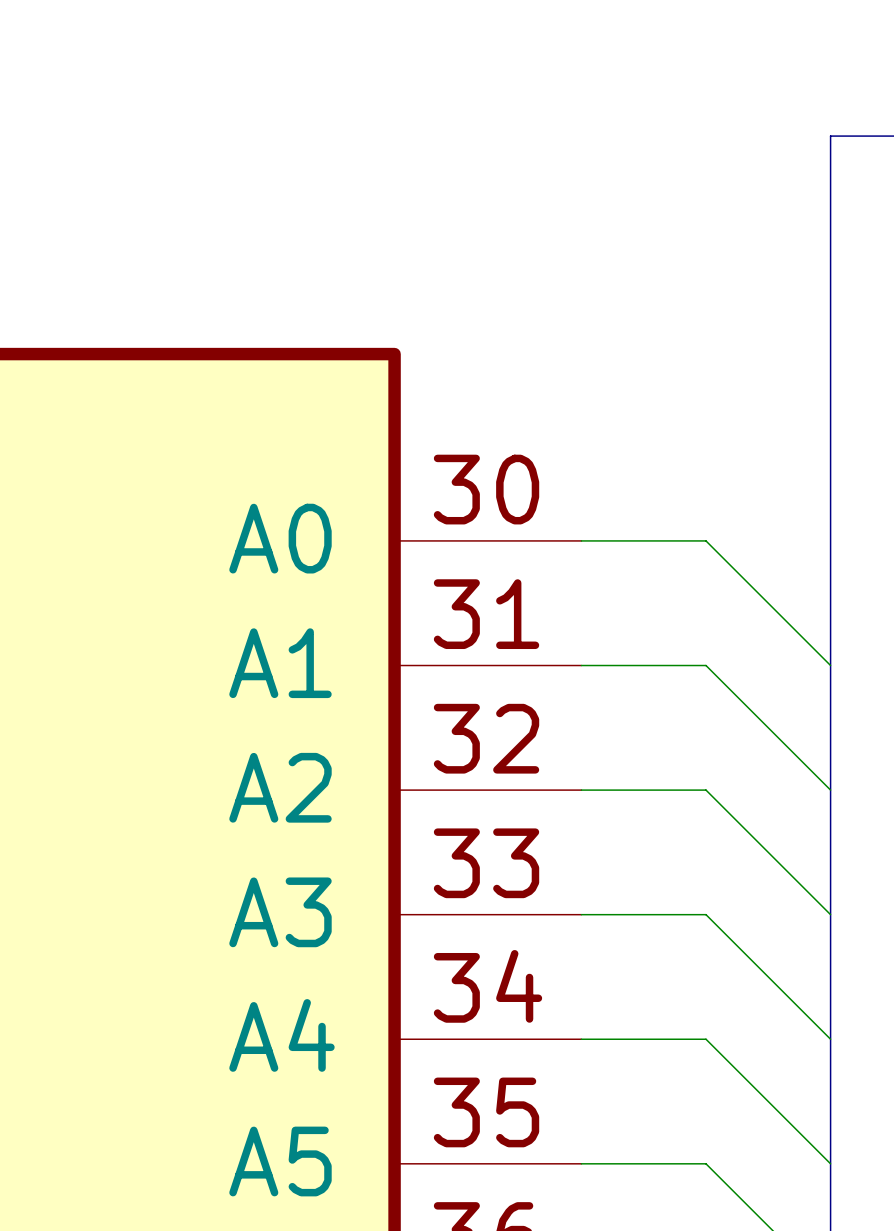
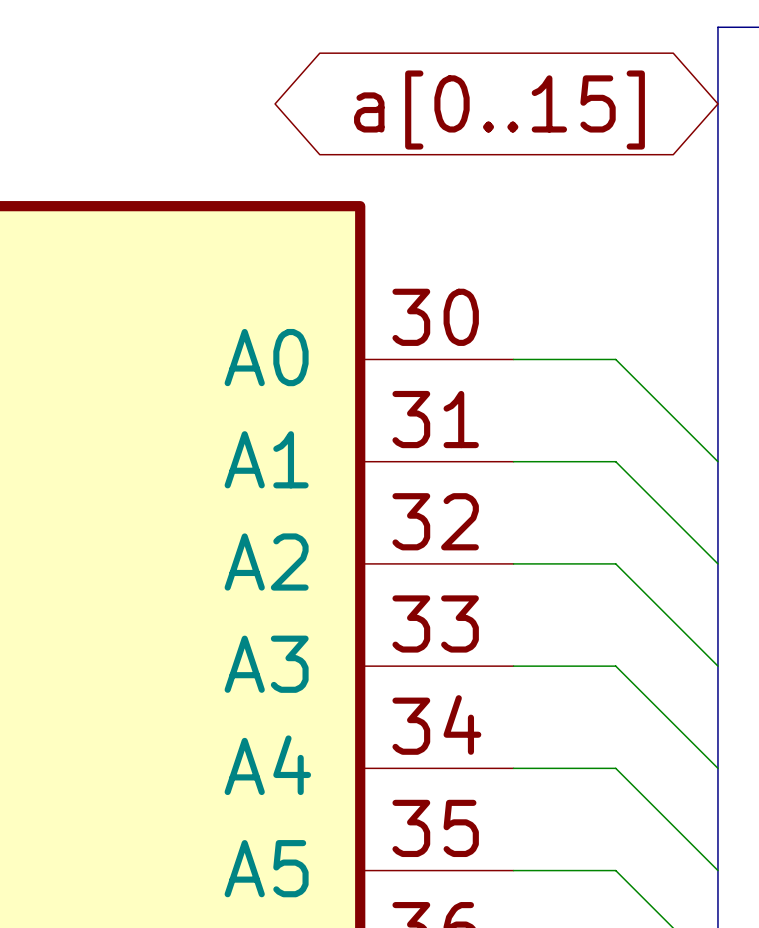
global label: none -> a[0..15] (499, 110)

